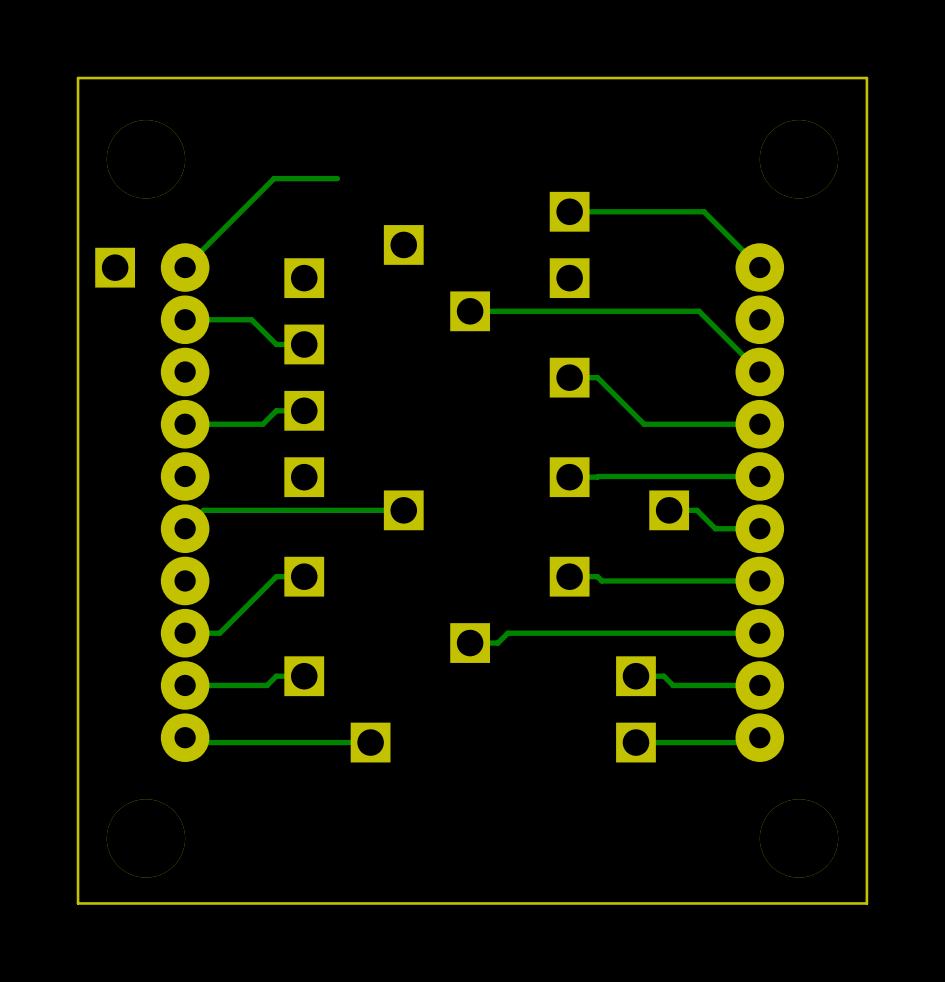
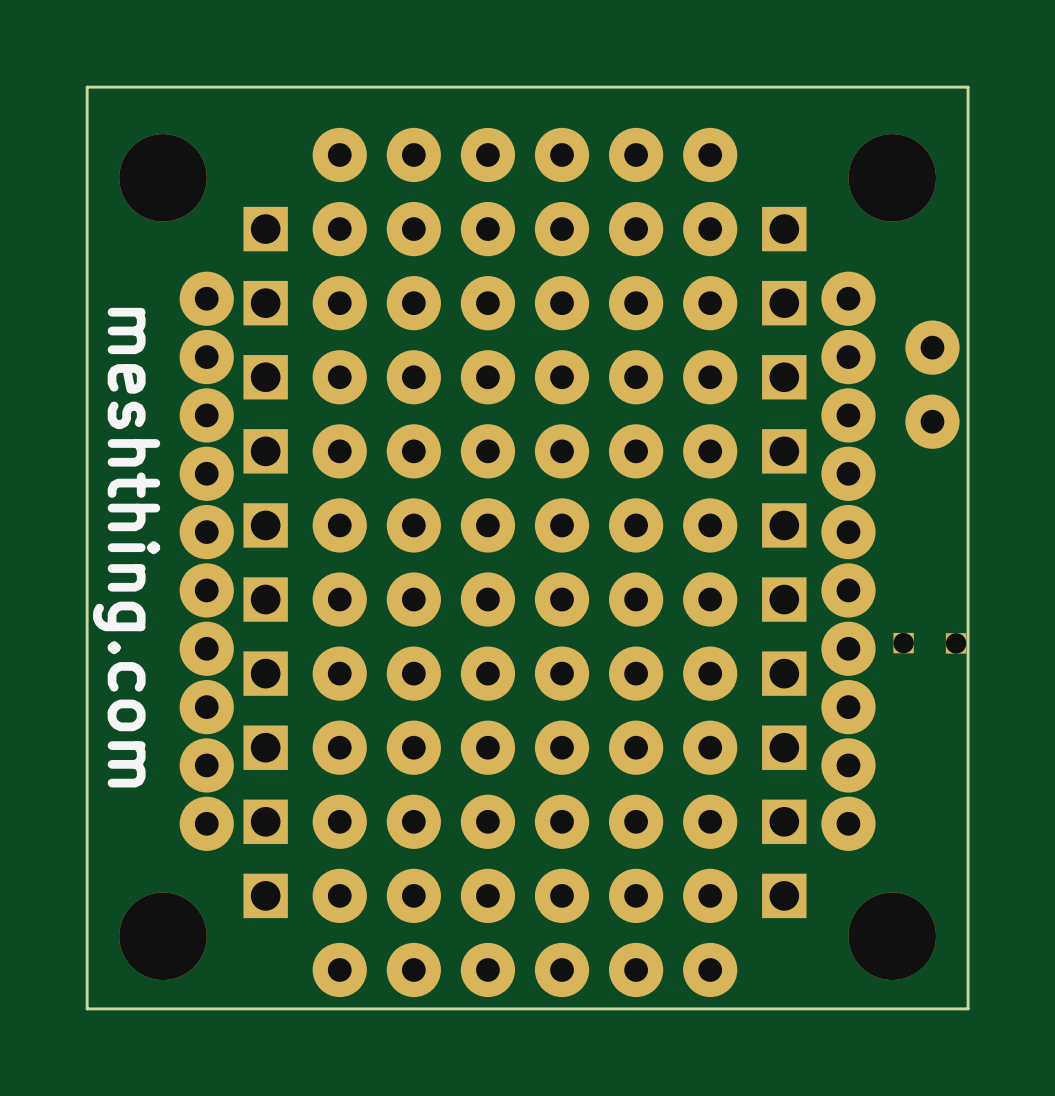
part: none -> (339, 154)
part: none -> (413, 154)
part: none -> (487, 154)
part: none -> (562, 154)
part: none -> (636, 154)
part: none -> (710, 154)
track: (337, 178) (274, 178) (185, 267) -> none
part footprint: [549, 191, 590, 232] -> [608, 201, 664, 257]
part: none -> (265, 229)
part: none -> (339, 229)
part: none -> (413, 229)
part: none -> (487, 229)
part: none -> (562, 229)
part: none -> (710, 229)
part: none -> (784, 229)
track: (569, 211) (704, 211) (759, 267) -> none
part: (403, 244) -> none
part footprint: [284, 258, 325, 299] -> [312, 276, 367, 331]
part footprint: [549, 258, 590, 299] -> [608, 276, 664, 331]
part: (115, 267) -> none
part: none -> (265, 303)
part: none -> (413, 303)
part: none -> (487, 303)
part: none -> (562, 303)
part: none -> (710, 303)
part: none -> (784, 303)
track: (470, 311) (699, 311) (759, 372) -> none
part: (470, 311) -> none
part: none -> (932, 347)
track: (185, 319) (251, 319) (276, 344) (304, 344) -> none
part footprint: [284, 324, 325, 365] -> [312, 350, 367, 405]
part: none -> (265, 377)
part: none -> (413, 377)
part: none -> (487, 377)
part: none -> (562, 377)
part: none -> (636, 377)
part: none -> (710, 377)
part: none -> (784, 377)
track: (569, 377) (597, 377) (644, 424) (759, 424) -> none
part: (569, 377) -> none
part: none -> (932, 421)
part footprint: [284, 390, 325, 431] -> [312, 424, 367, 479]
part: none -> (265, 451)
part: none -> (413, 451)
part: none -> (487, 451)
part: none -> (562, 451)
part: none -> (636, 451)
part: none -> (710, 451)
part: none -> (784, 451)
track: (304, 410) (276, 410) (262, 424) (185, 424) -> none
part footprint: [284, 457, 325, 498] -> [312, 498, 367, 553]
part footprint: [549, 457, 590, 498] -> [608, 498, 664, 553]
part: none -> (265, 525)
part: none -> (413, 525)
part: none -> (487, 525)
part: none -> (562, 525)
part: none -> (710, 525)
part: none -> (784, 525)
track: (759, 476) (569, 477) -> none
text: none -> meshthing.com (126, 547)
track: (403, 510) (203, 510) (185, 528) -> none
part: (403, 510) -> none
track: (669, 510) (697, 510) (715, 528) (759, 528) -> none
part: (669, 510) -> none
part: none -> (265, 599)
part: none -> (339, 599)
part: none -> (413, 599)
part: none -> (487, 599)
part: none -> (562, 599)
part: none -> (636, 599)
part: none -> (710, 599)
part: none -> (784, 599)
track: (304, 576) (276, 576) (219, 633) (185, 633) -> none
part: (304, 576) -> none
track: (569, 576) (597, 576) (601, 580) (759, 580) -> none
part: (569, 576) -> none
part: none -> (929, 643)
part: none -> (265, 673)
part: none -> (339, 673)
part: none -> (413, 673)
part: none -> (487, 673)
part: none -> (562, 673)
part: none -> (636, 673)
part: none -> (710, 673)
part: none -> (784, 673)
track: (759, 633) (507, 633) (497, 643) (470, 643) -> none
part: (470, 643) -> none
part footprint: [284, 656, 325, 697] -> [312, 720, 367, 775]
part footprint: [616, 656, 656, 697] -> [683, 720, 738, 775]
part: none -> (265, 747)
part: none -> (413, 747)
part: none -> (487, 747)
part: none -> (562, 747)
part: none -> (636, 747)
part: none -> (784, 747)
track: (304, 676) (276, 676) (267, 685) (185, 685) -> none
track: (635, 676) (663, 676) (673, 685) (759, 685) -> none
part footprint: [350, 722, 391, 763] -> [386, 794, 441, 849]
part footprint: [616, 722, 656, 763] -> [683, 794, 738, 849]
part: none -> (265, 821)
part: none -> (339, 821)
part: none -> (487, 821)
part: none -> (562, 821)
part: none -> (636, 821)
part: none -> (784, 821)
track: (185, 737) (189, 742) (370, 742) -> none
track: (759, 737) (754, 742) (635, 742) -> none
part: none -> (265, 895)
part: none -> (339, 895)
part: none -> (413, 895)
part: none -> (487, 895)
part: none -> (562, 895)
part: none -> (636, 895)
part: none -> (710, 895)
part: none -> (784, 895)
part: none -> (339, 969)
part: none -> (413, 969)
part: none -> (487, 969)
part: none -> (562, 969)
part: none -> (636, 969)
part: none -> (710, 969)

